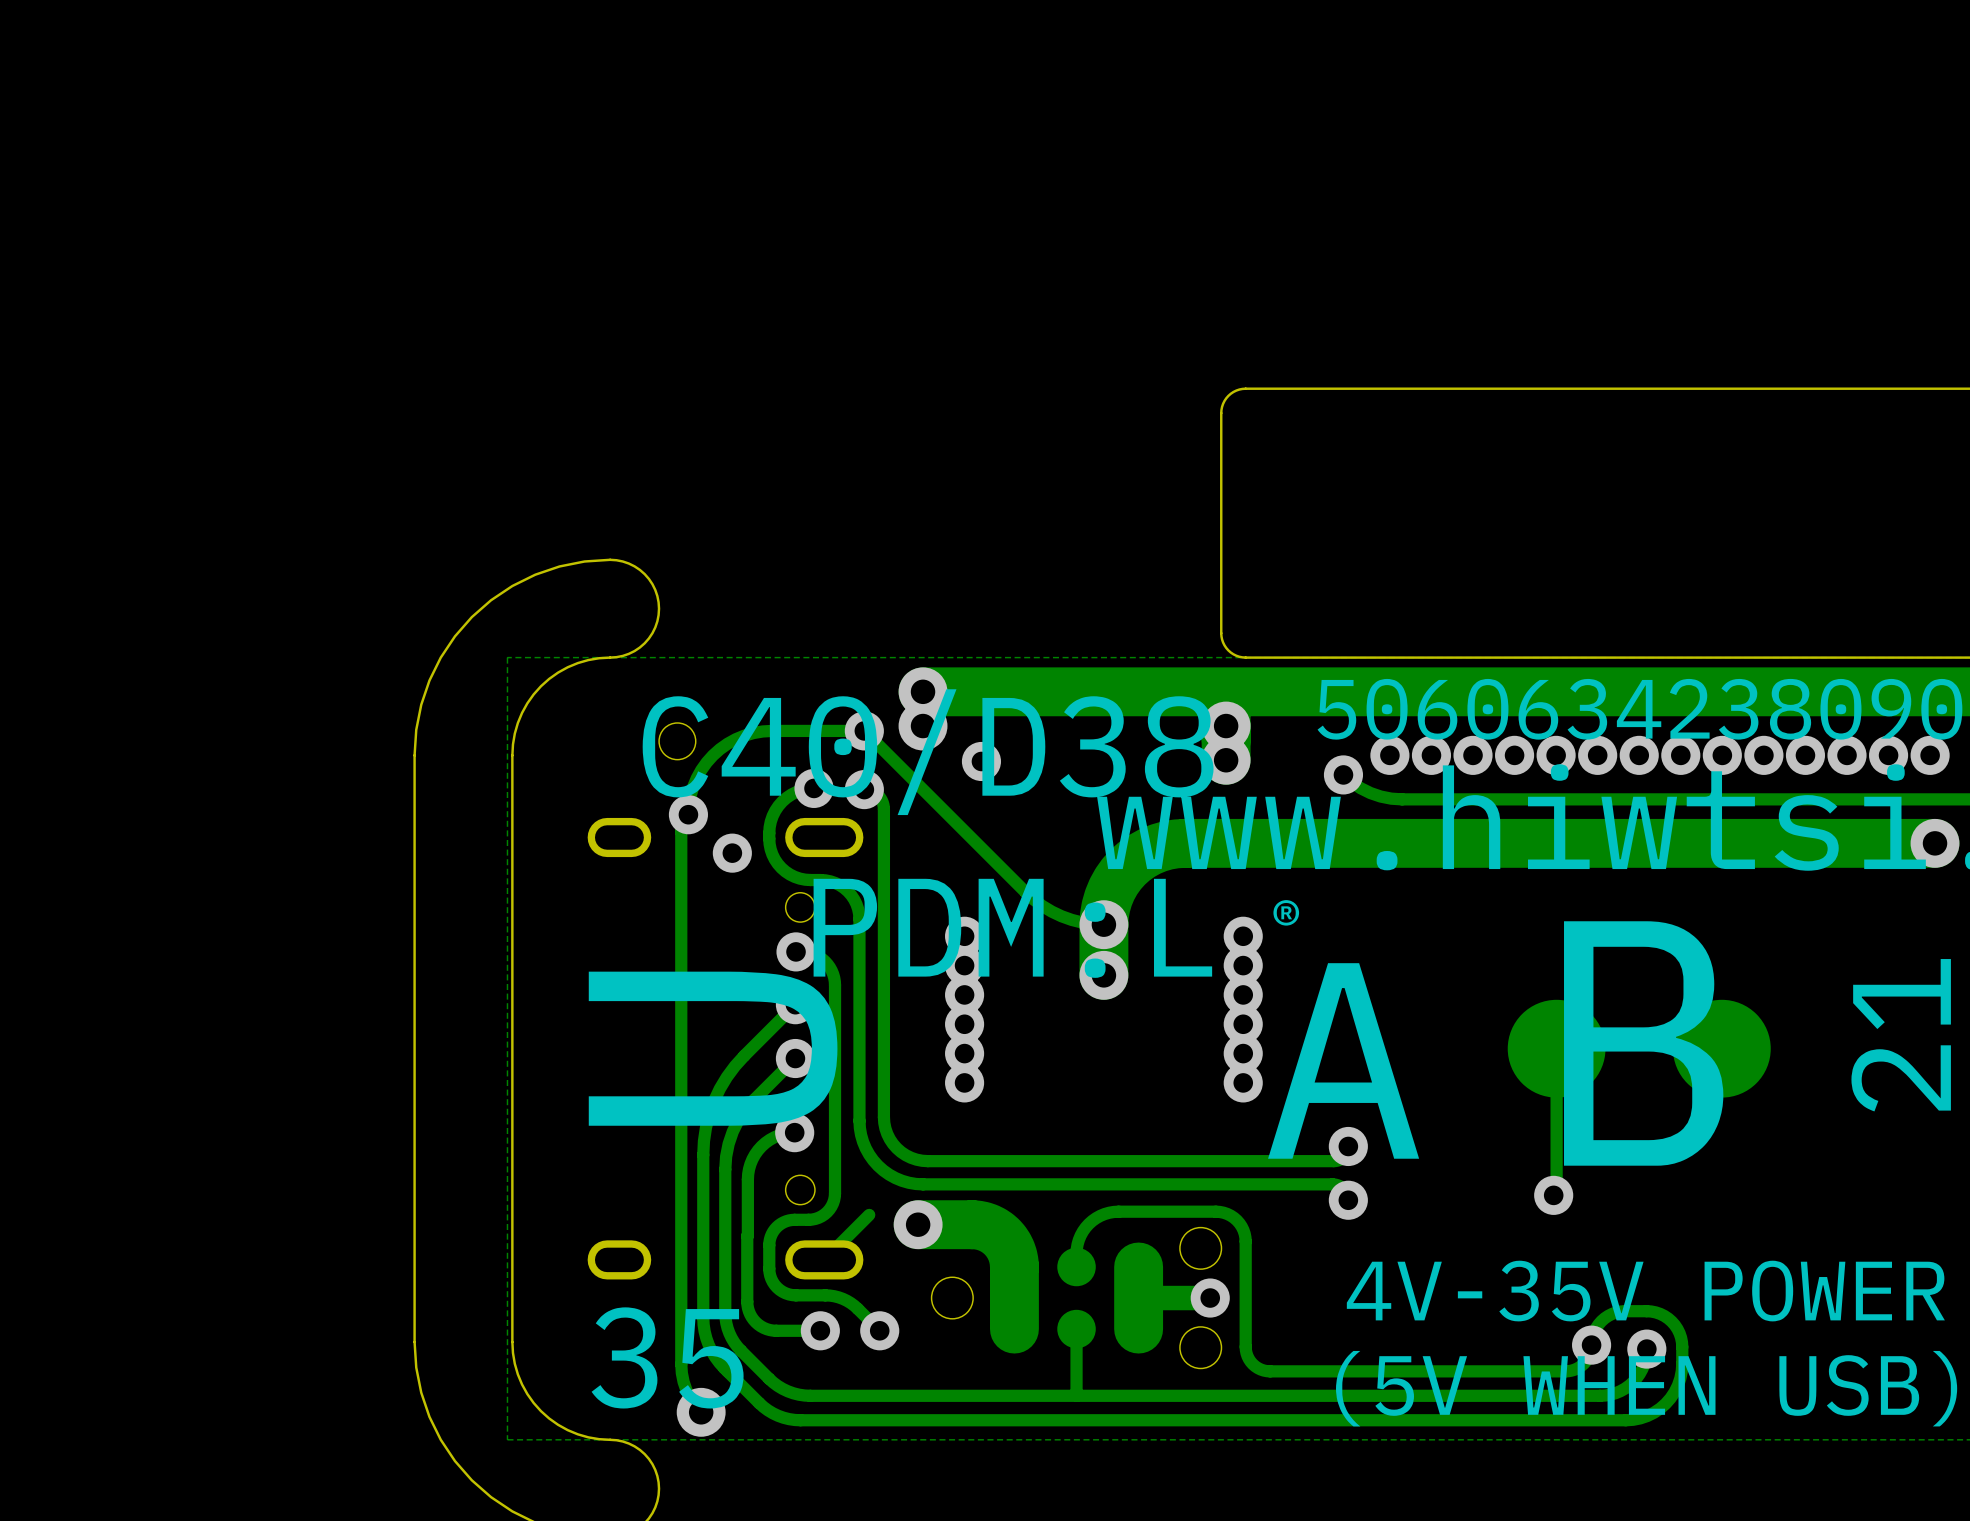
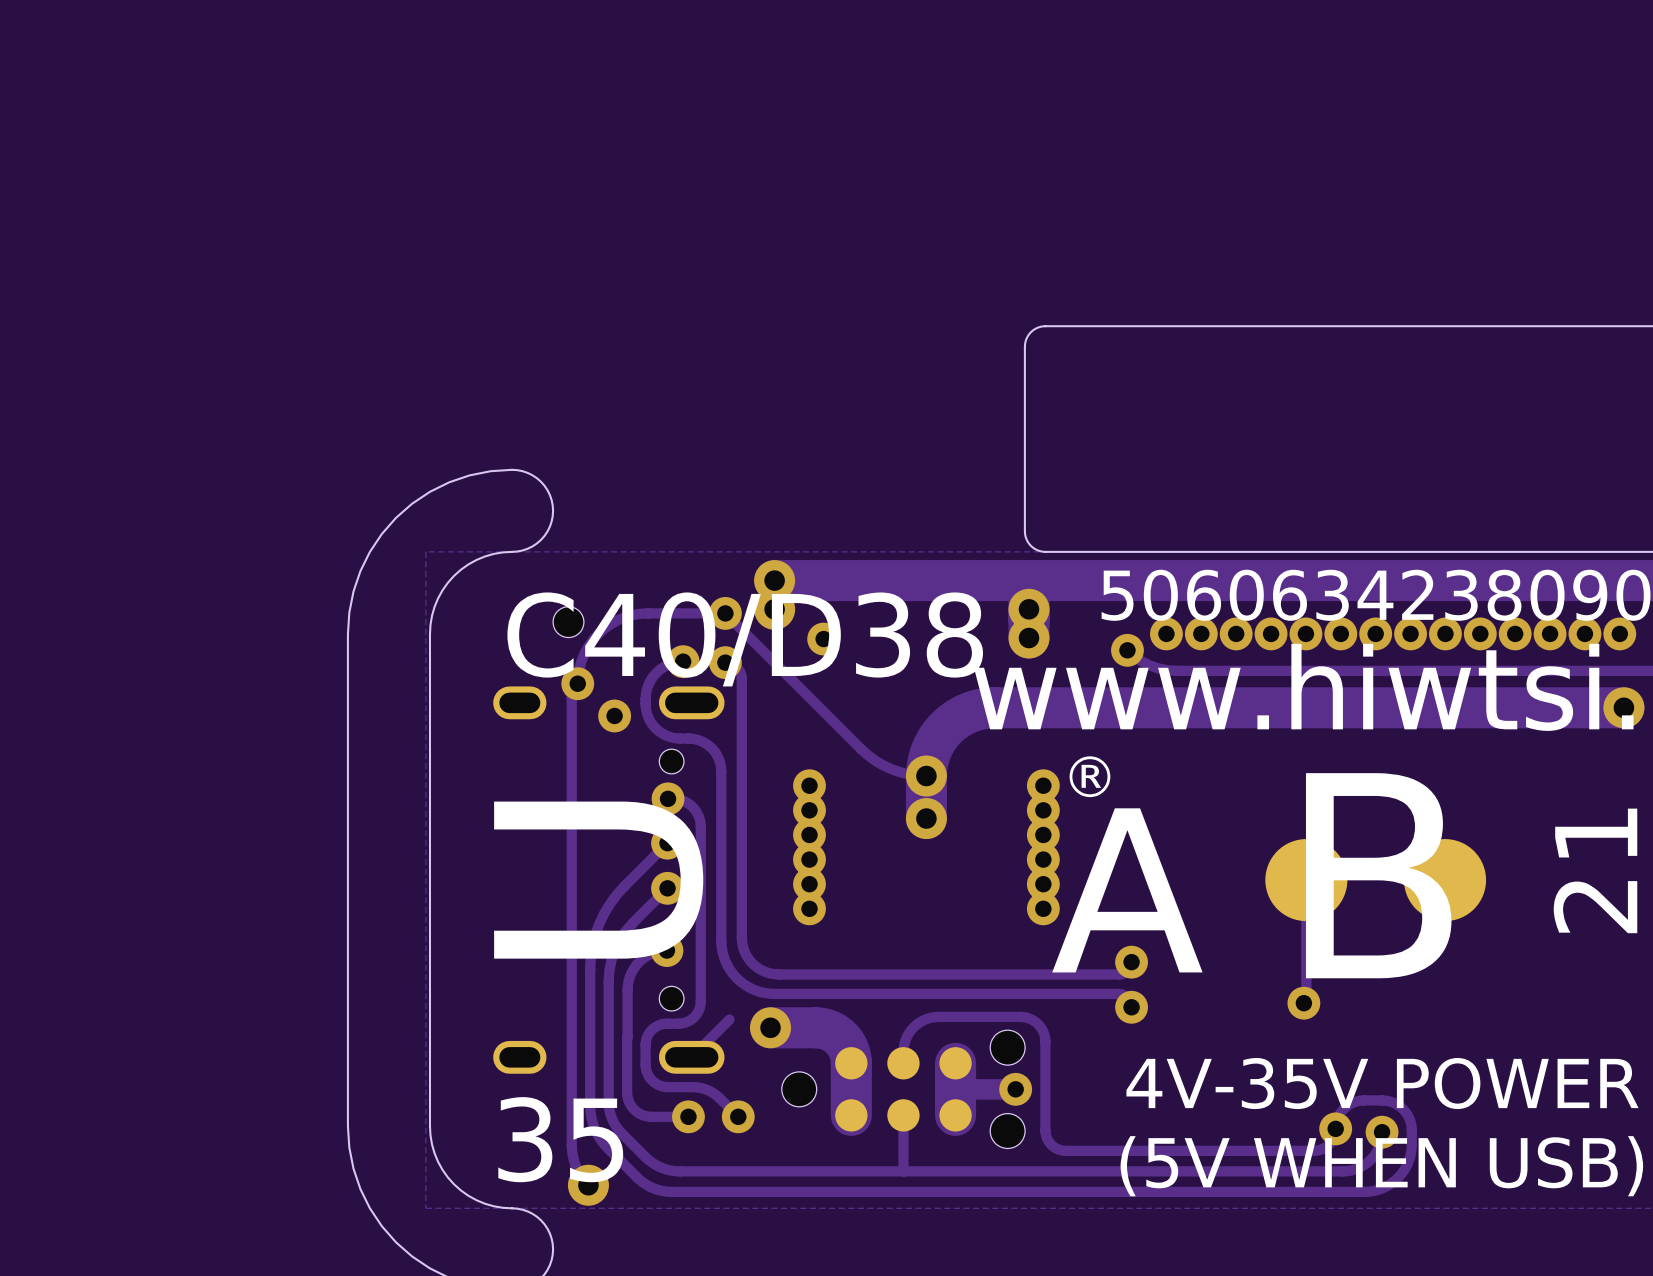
text position: C40/D38 (928, 752) -> C40/D38 (745, 639)
text: PDM:L (1012, 928) -> none

